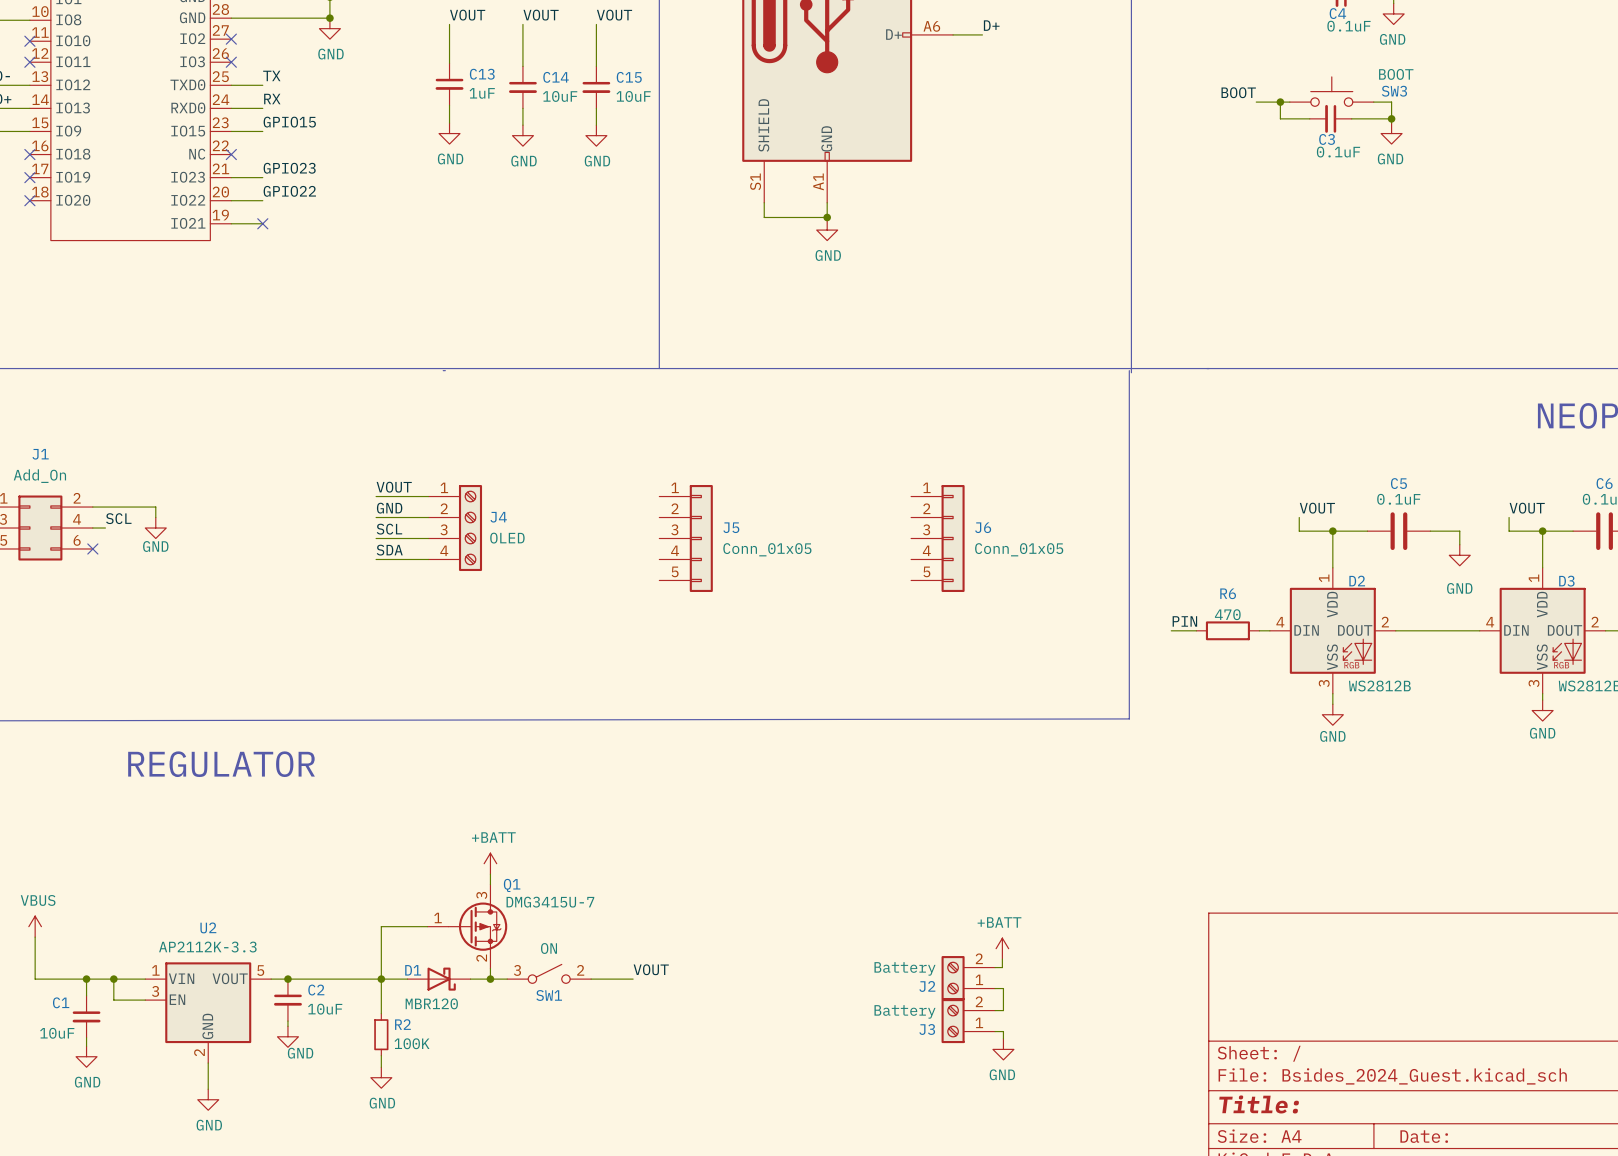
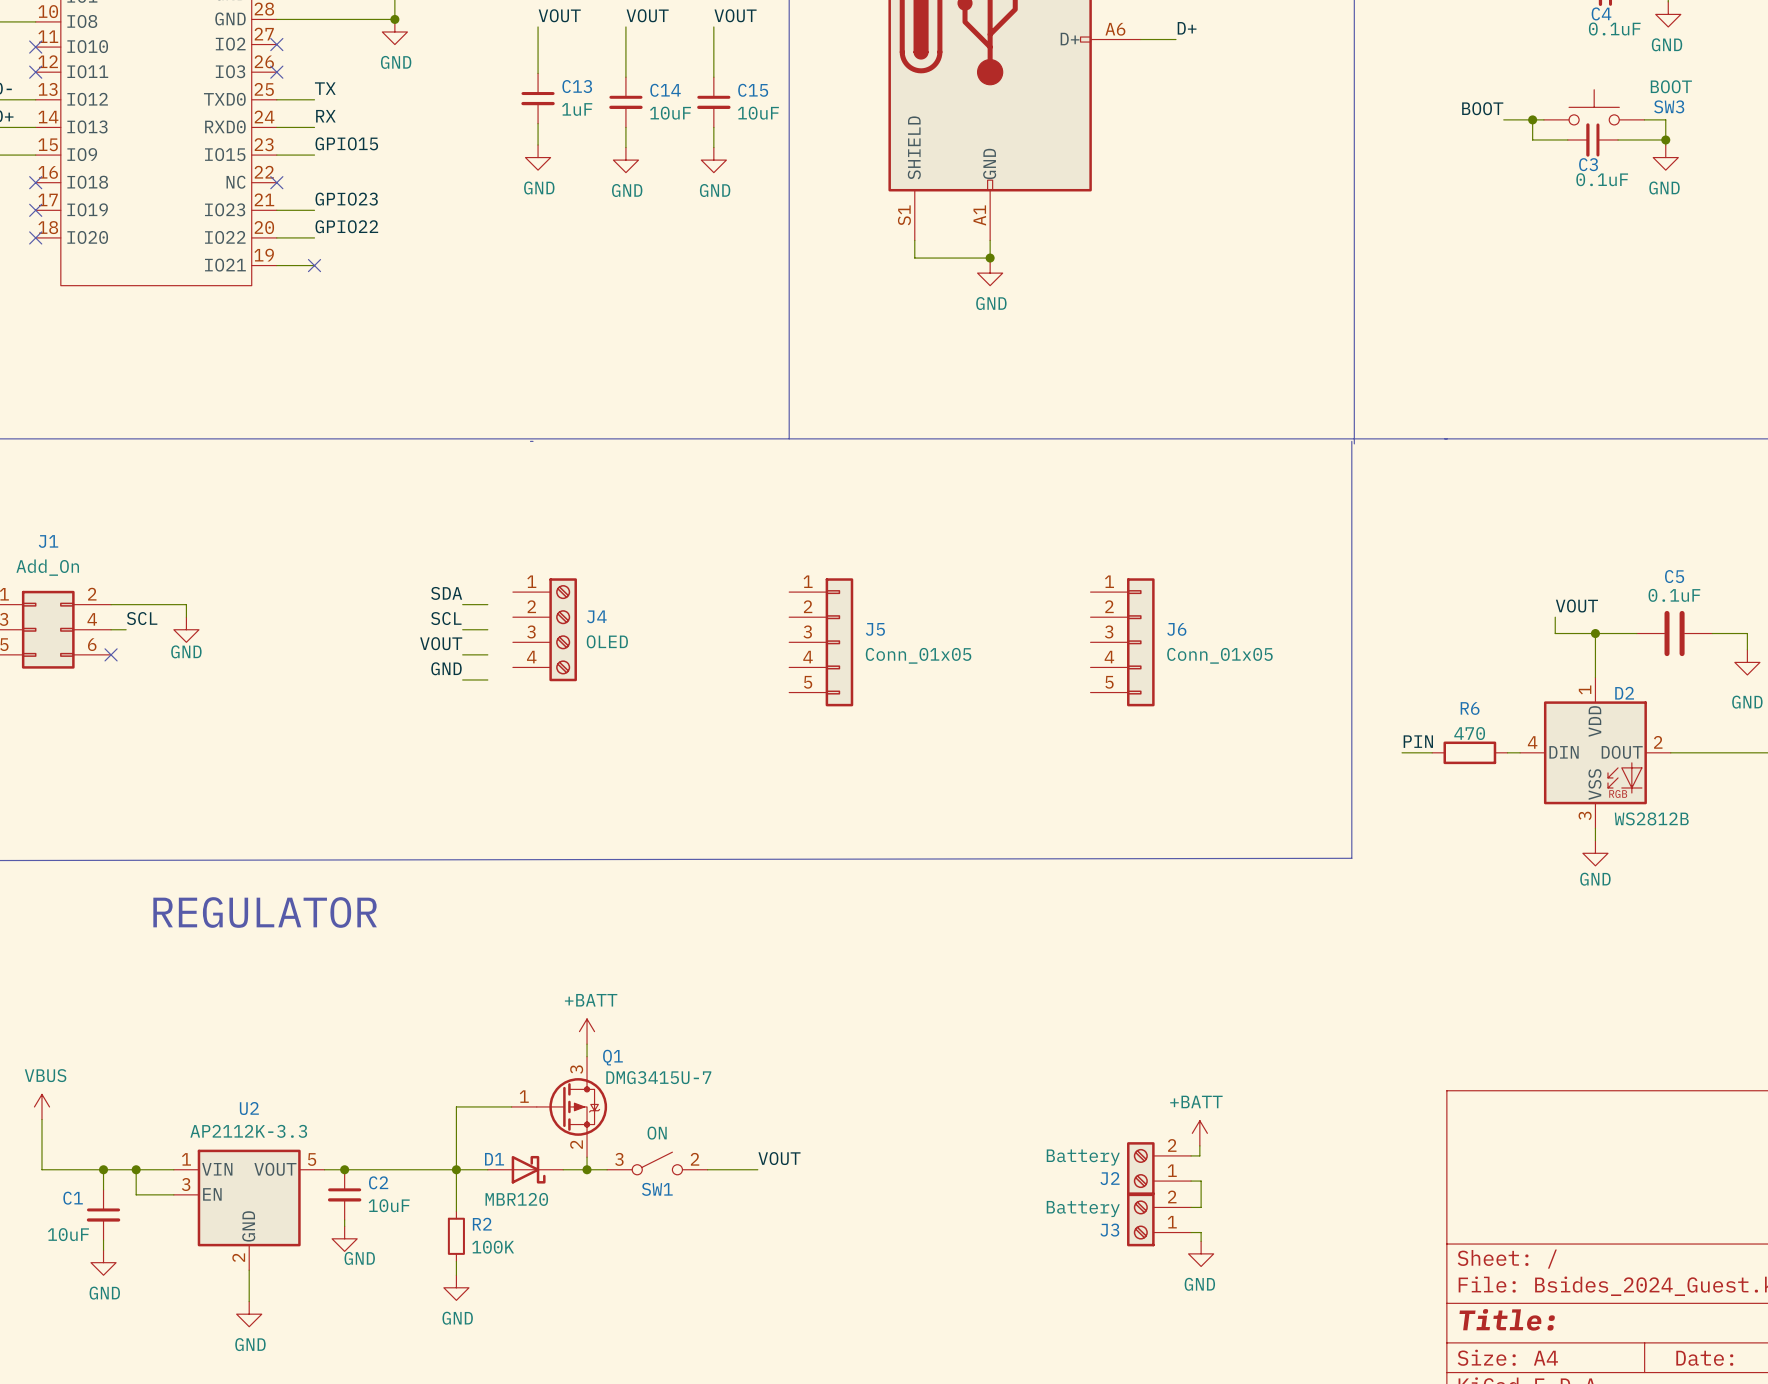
label position: VOUT (394, 487) -> VOUT (441, 643)
wire: (376, 496) (428, 496) -> none
wire: none -> (462, 604) (487, 604)
label position: GND (389, 508) -> GND (446, 668)
wire: (376, 517) (428, 517) -> none
wire: none -> (462, 629) (487, 629)
label position: SCL (389, 529) -> SCL (446, 618)
wire: (376, 538) (428, 538) -> none
wire: none -> (462, 654) (487, 654)
label position: SDA (389, 550) -> SDA (446, 593)
wire: (376, 559) (428, 559) -> none
wire: none -> (462, 679) (487, 679)

